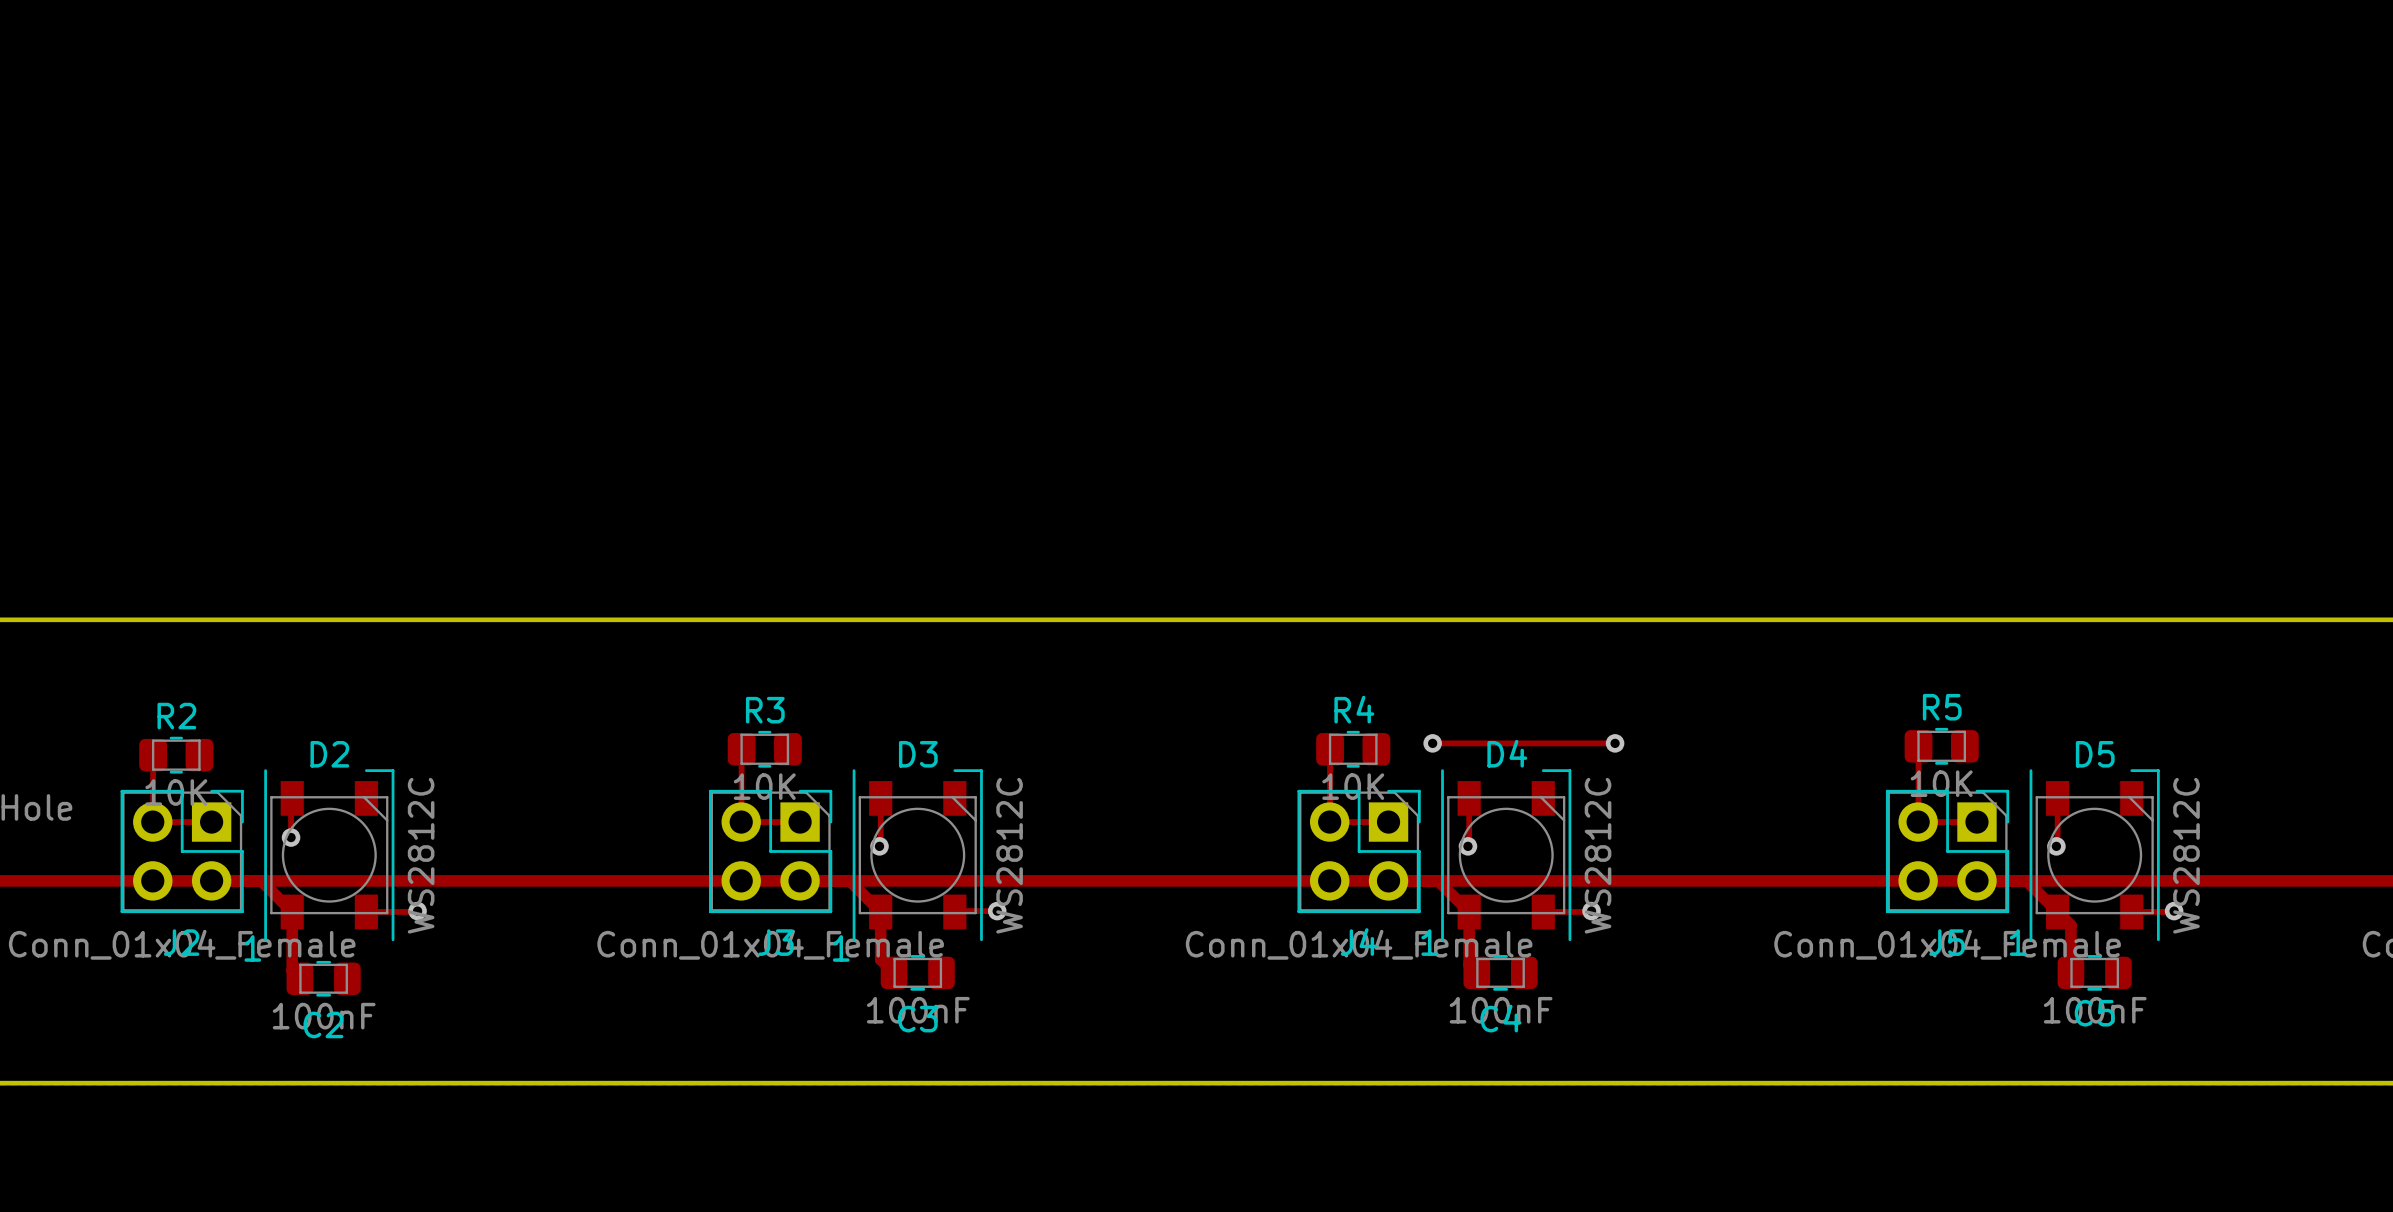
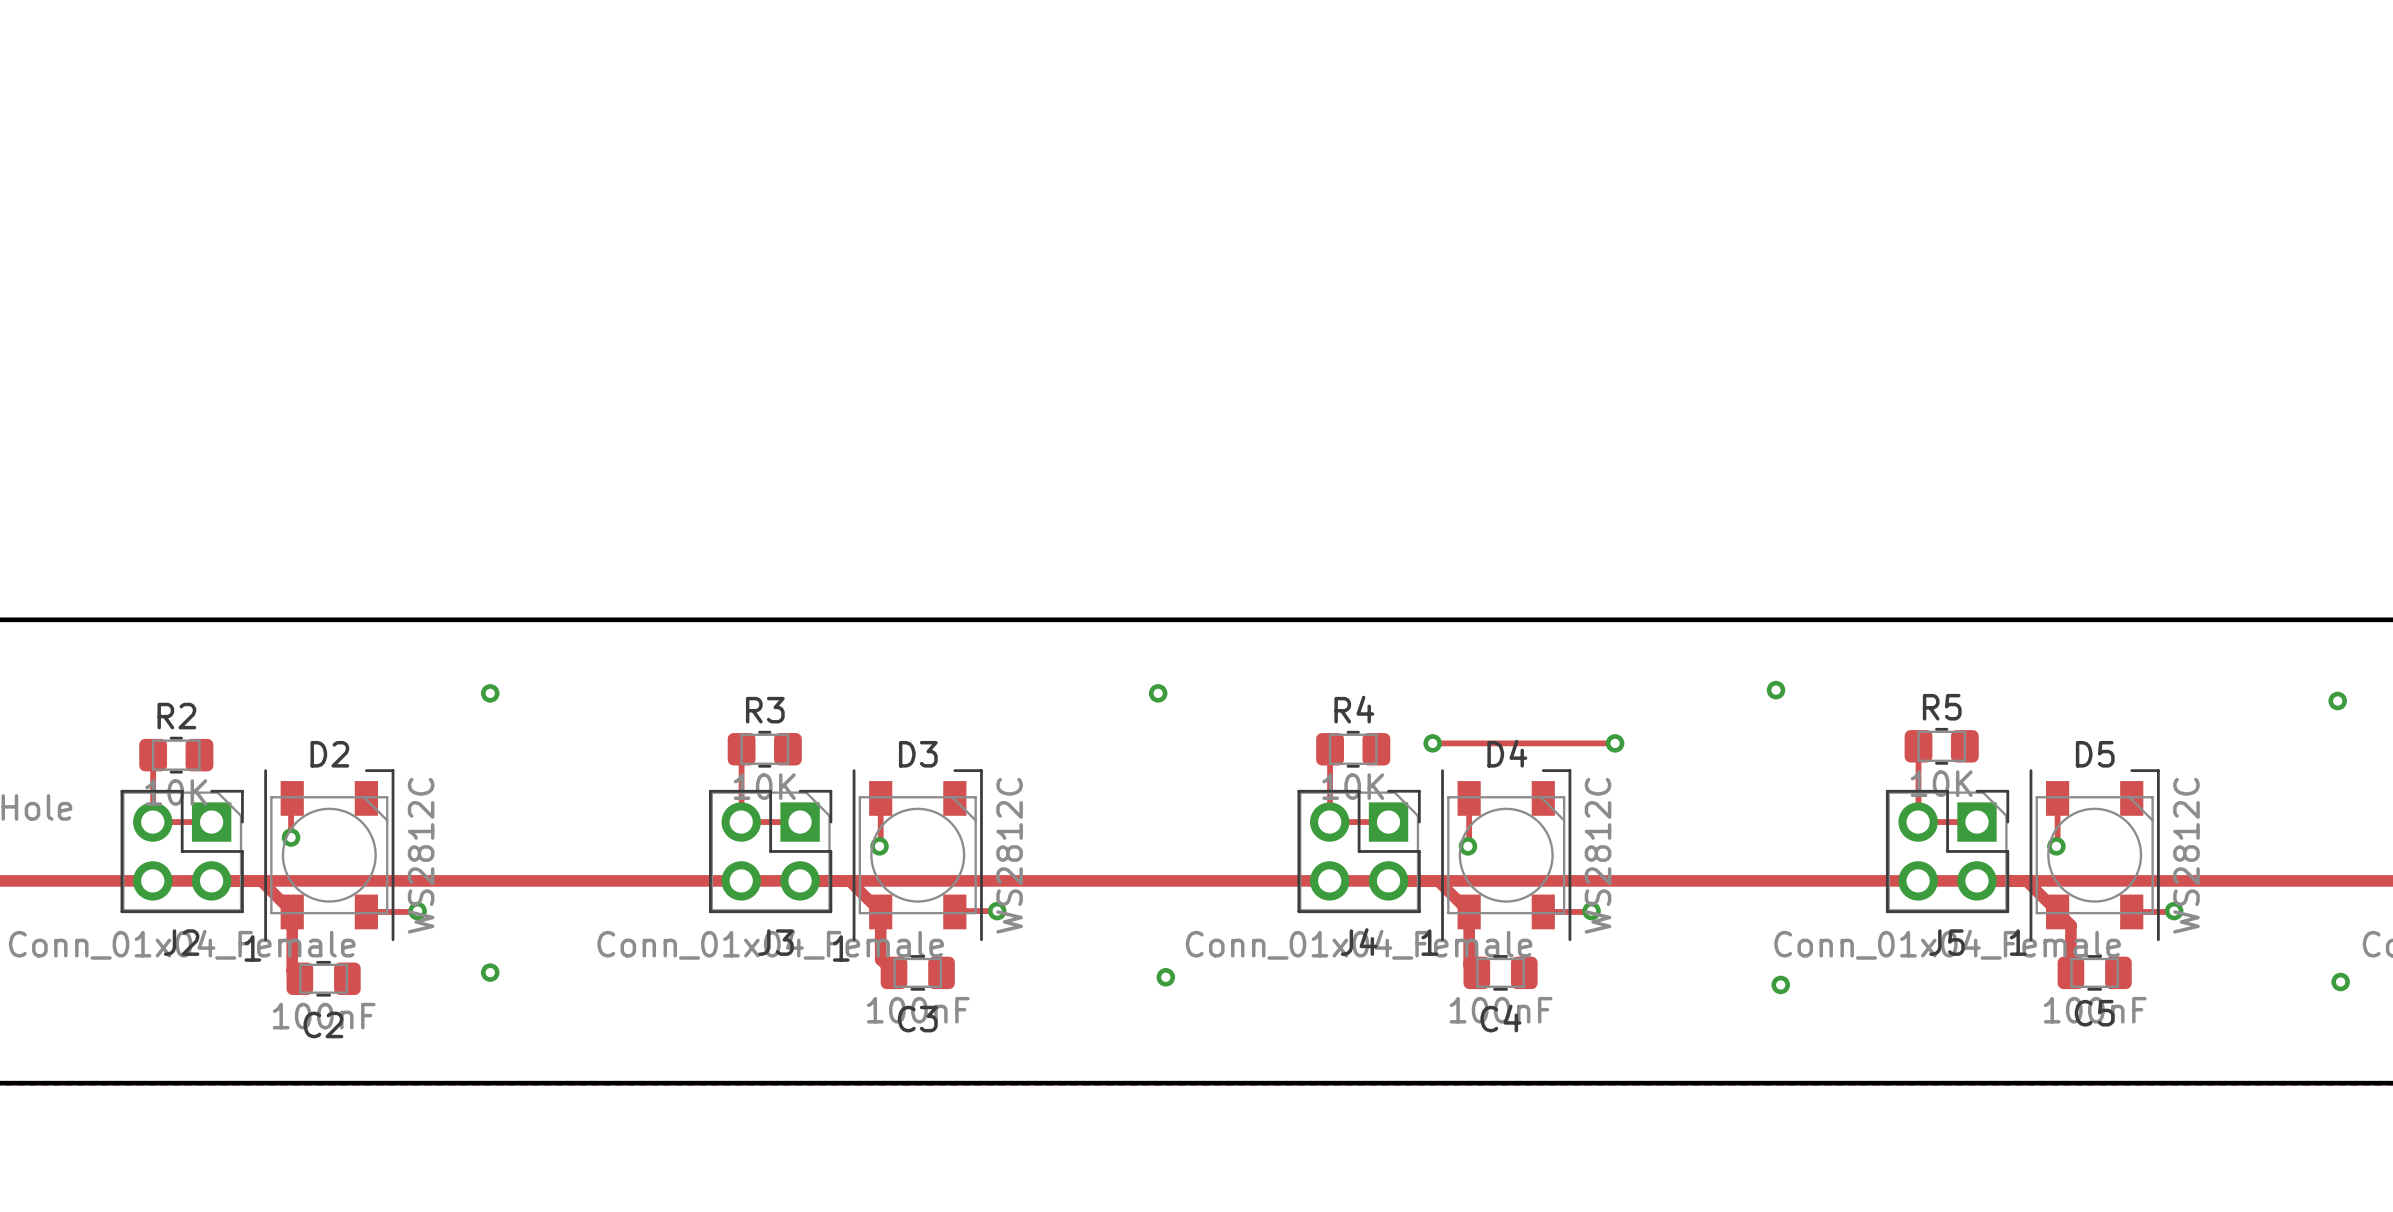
via: none -> (1776, 690)
via: none -> (490, 693)
via: none -> (1158, 693)
via: none -> (2337, 701)
via: none -> (490, 972)
via: none -> (1165, 977)
via: none -> (2340, 982)
via: none -> (1780, 984)

